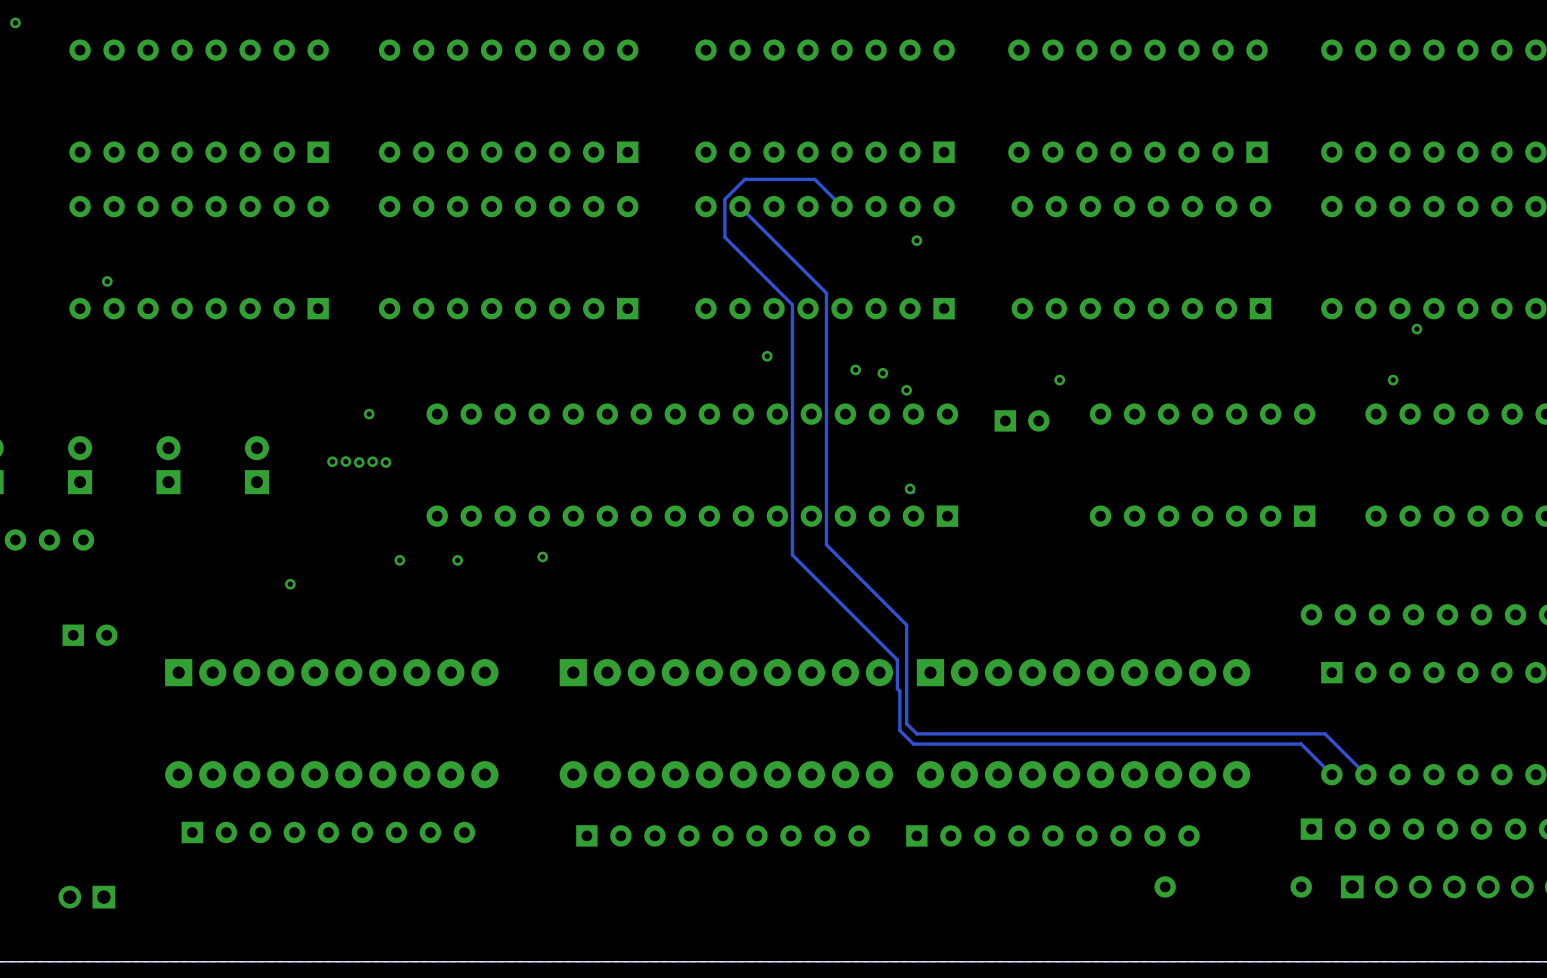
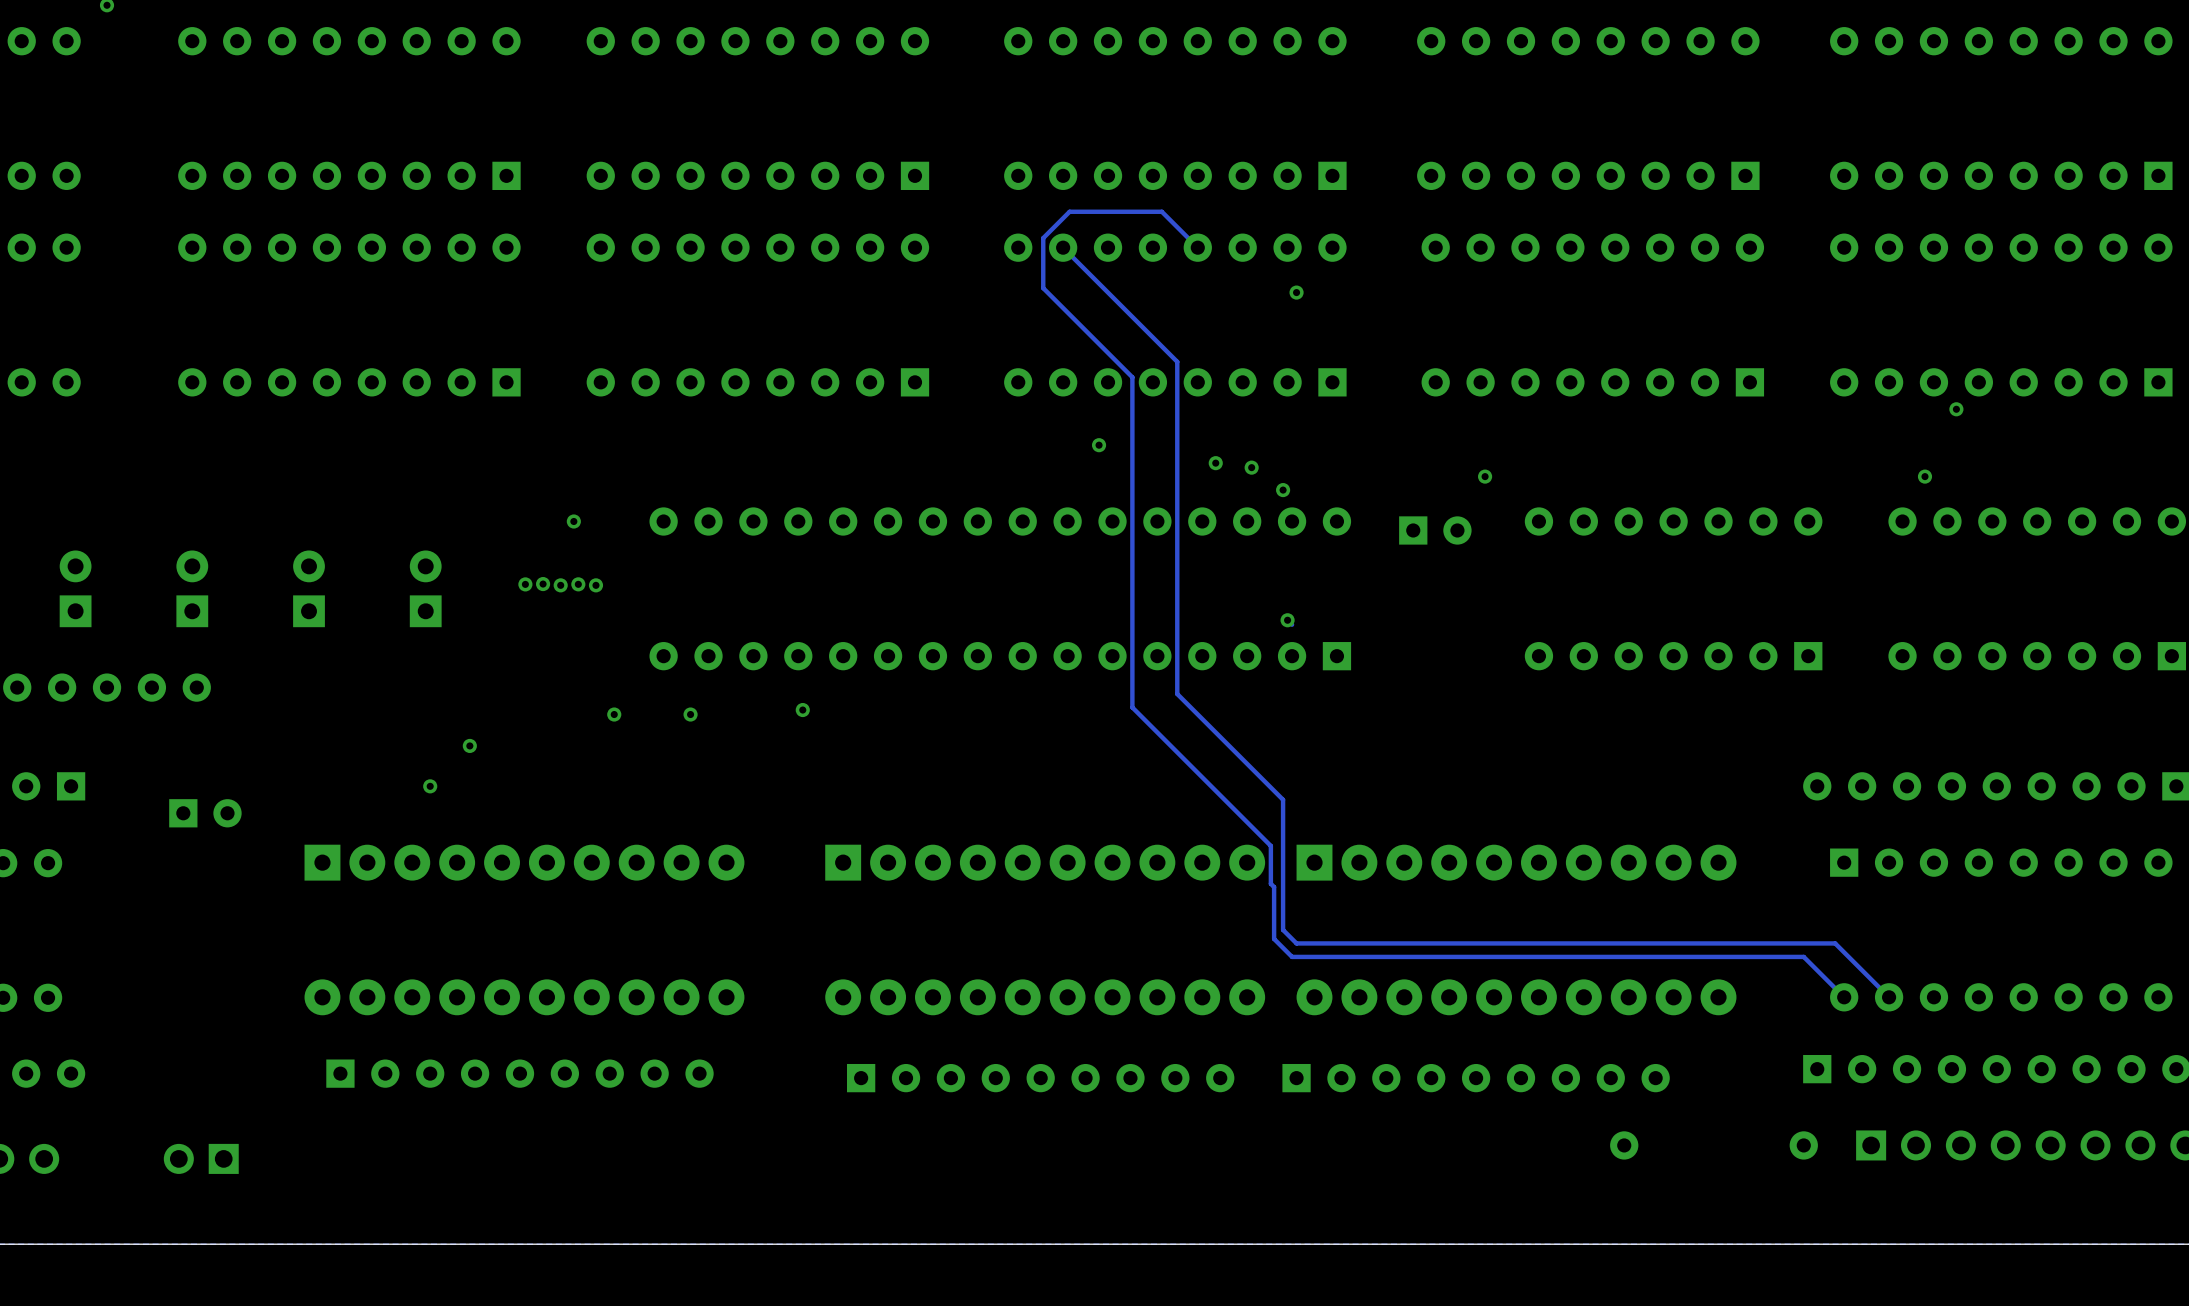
via: (107, 281) -> none
via: none -> (430, 786)

